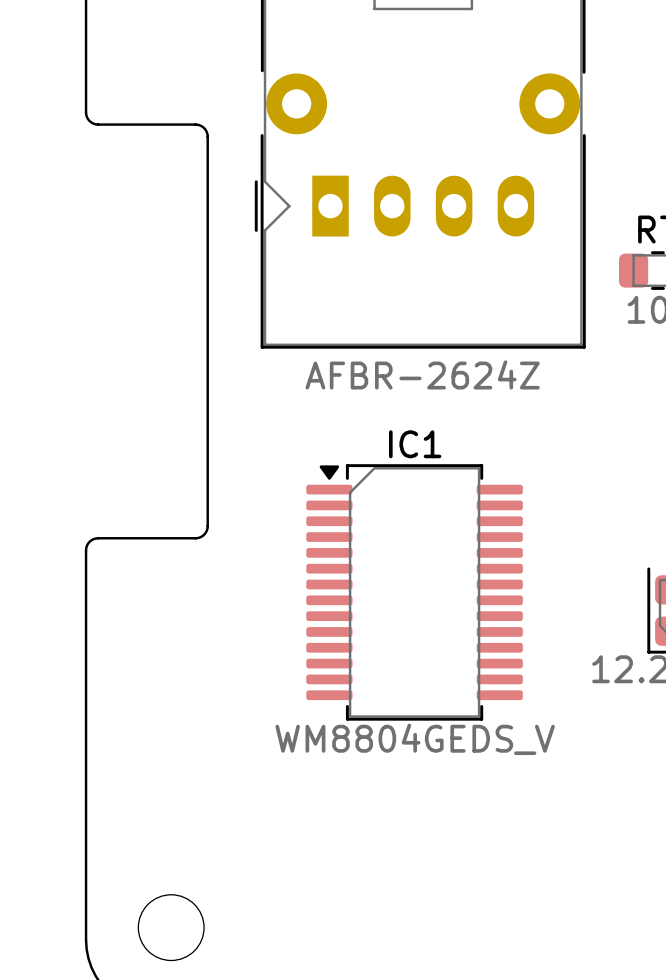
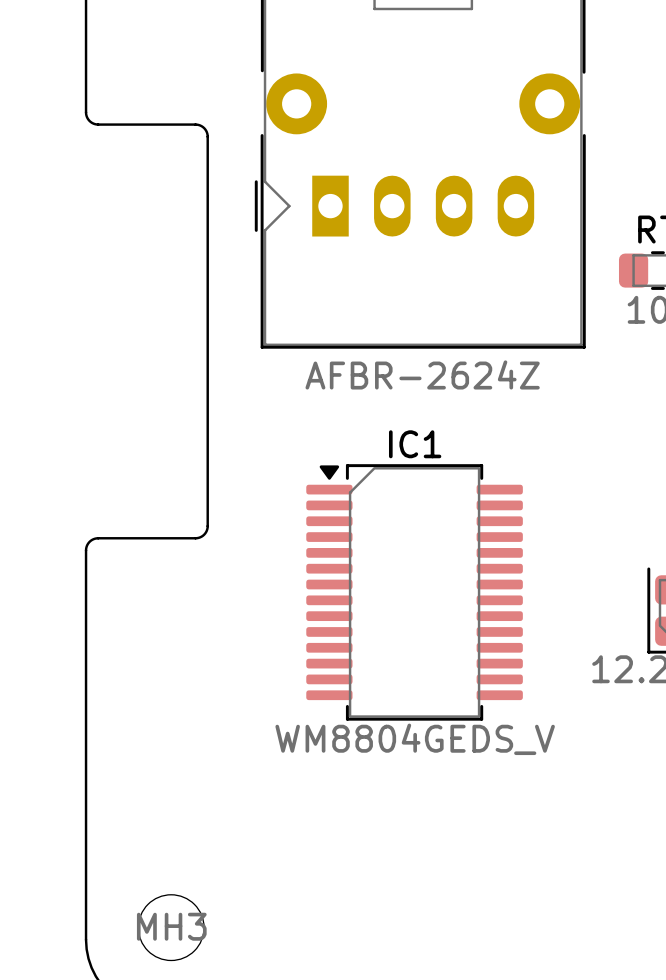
MH3 name: none -> MH3 (171, 926)

